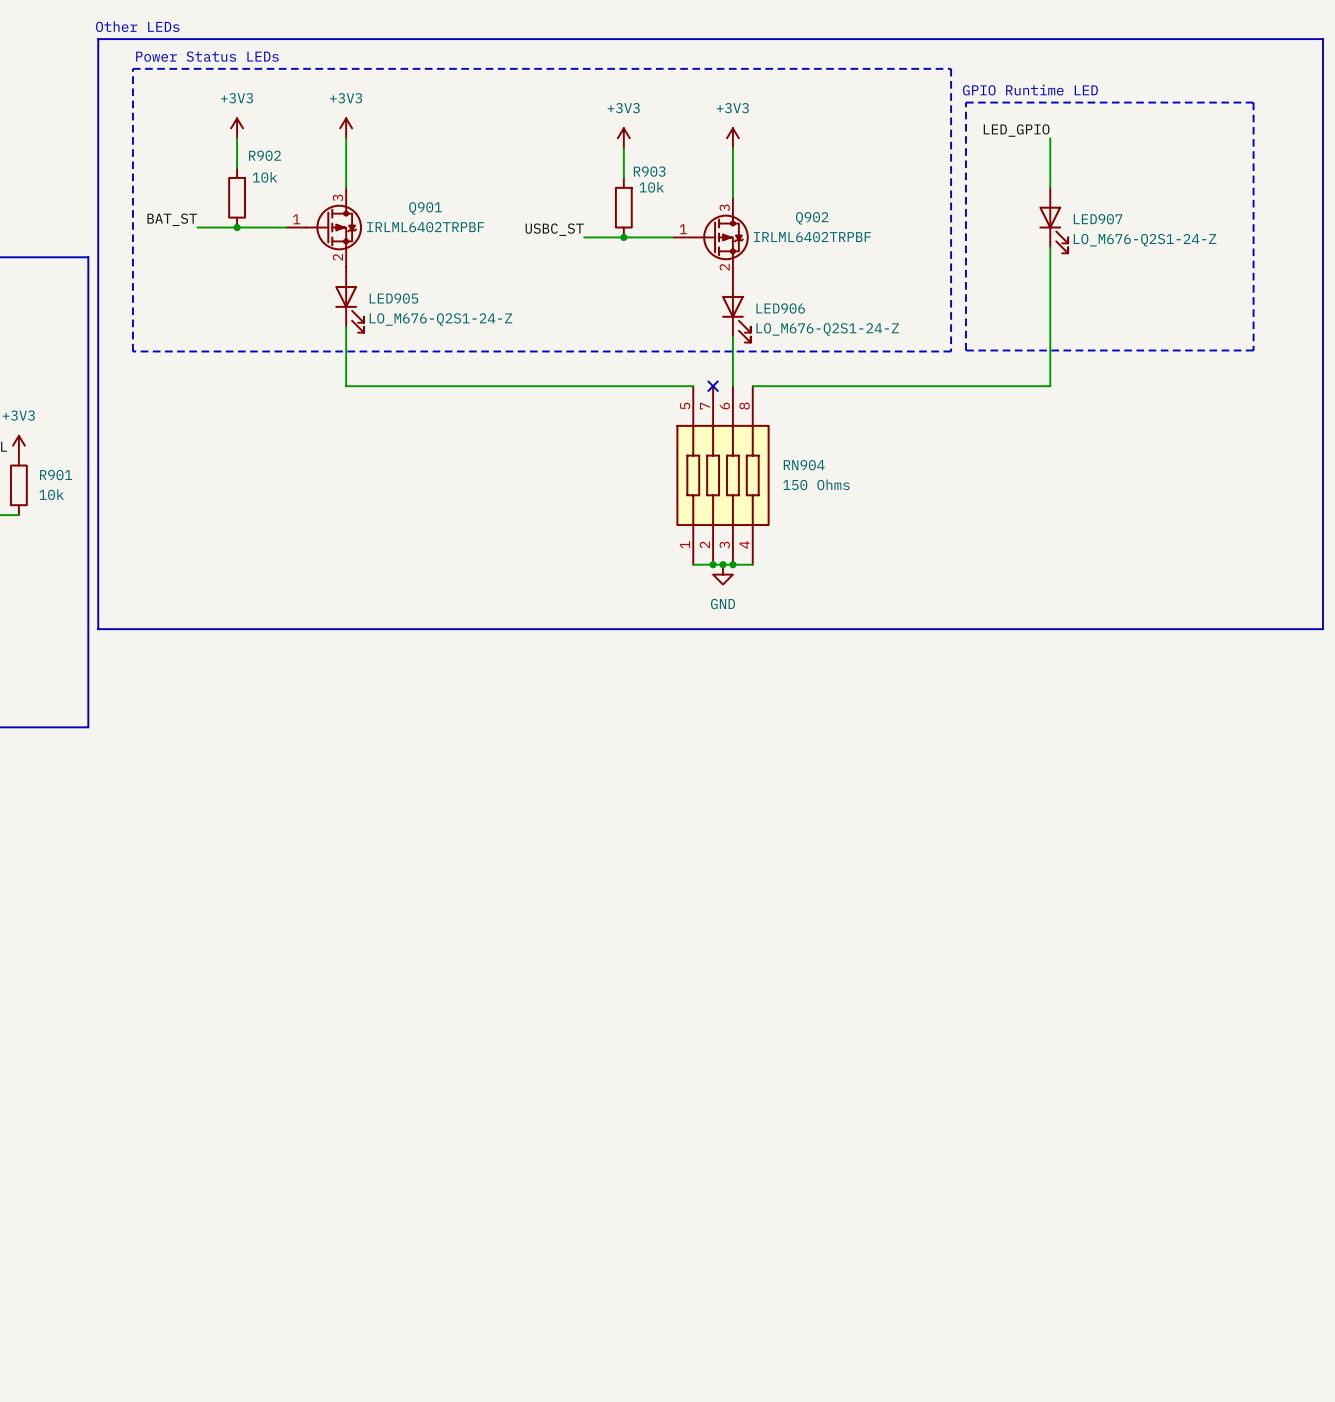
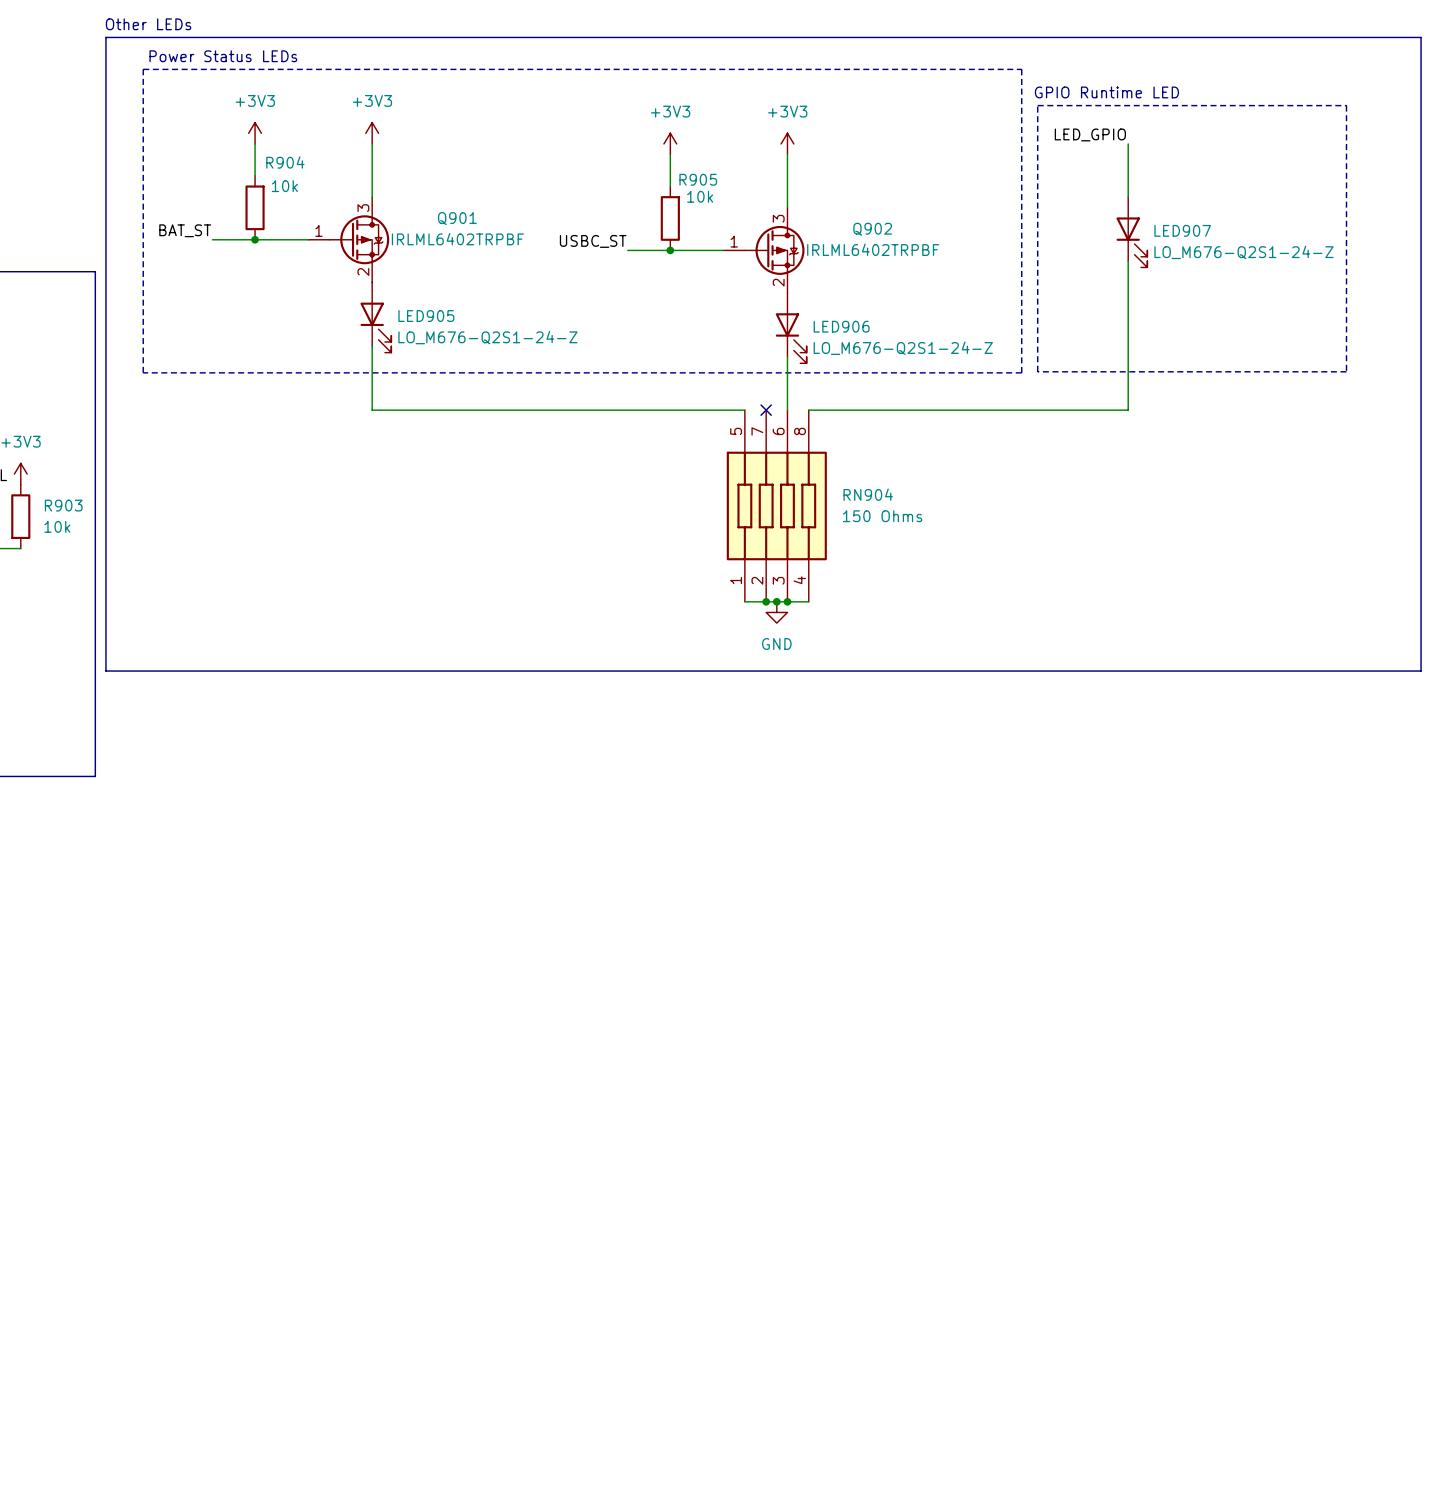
R902 name: R902 (265, 155) -> R904 (285, 162)
R903 name: R903 (649, 171) -> R905 (698, 179)
R901 name: R901 (56, 475) -> R903 (63, 505)

